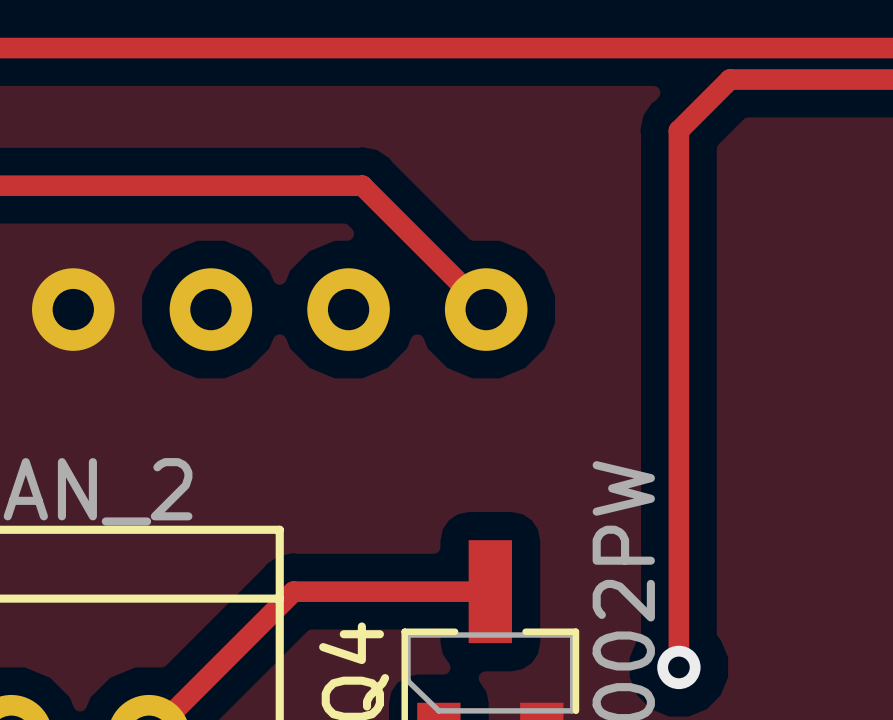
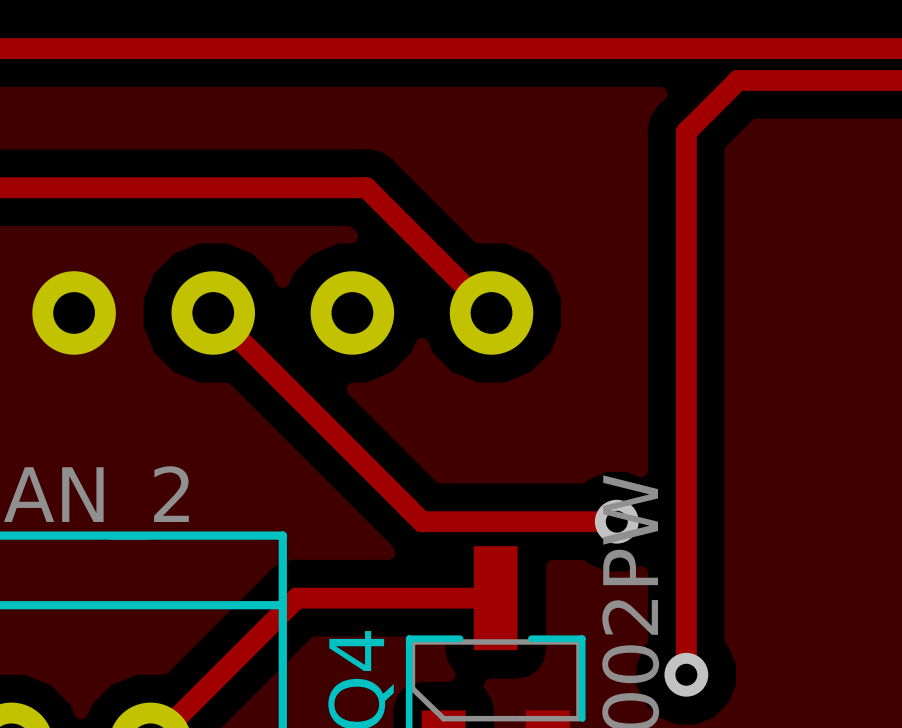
track: none -> (213, 312) (421, 521) (616, 521)
via: none -> (616, 521)

